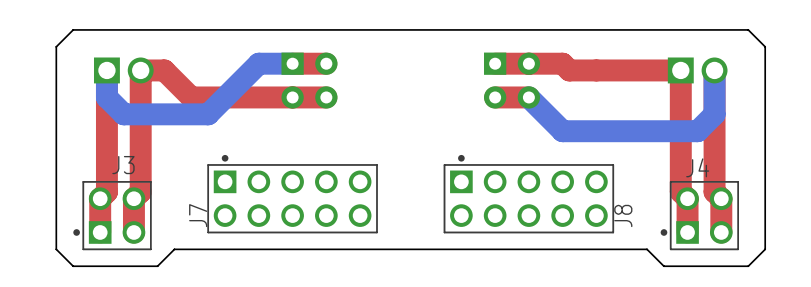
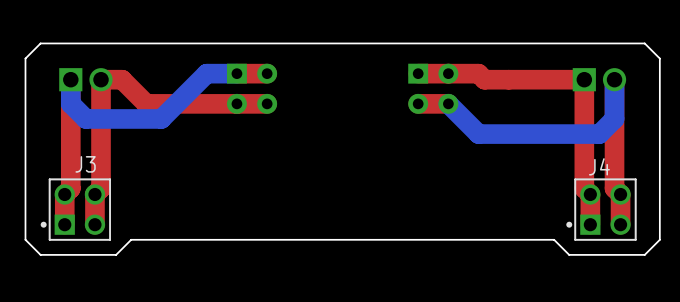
J7: (292, 194) -> none
J8: (528, 194) -> none

